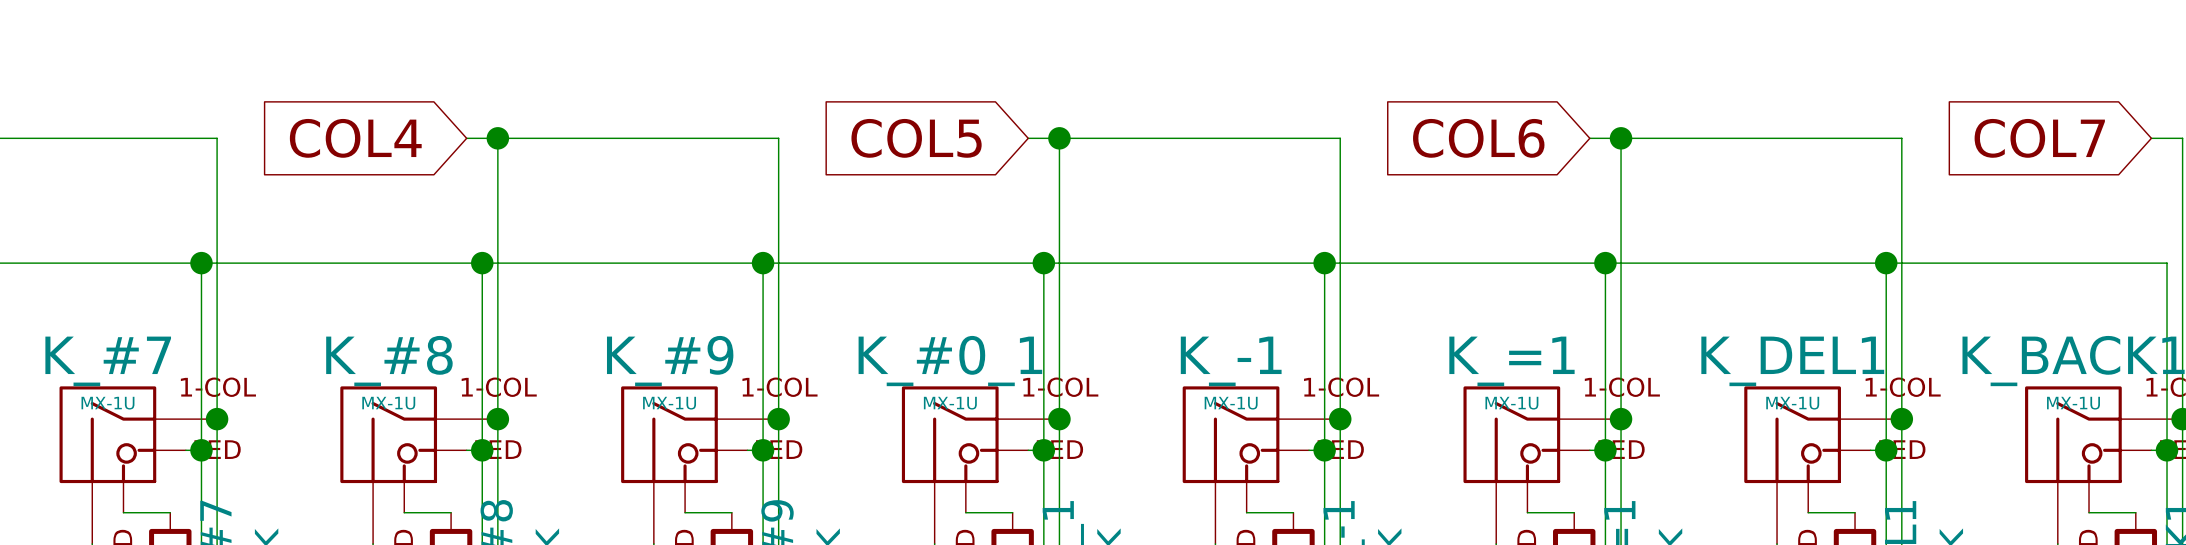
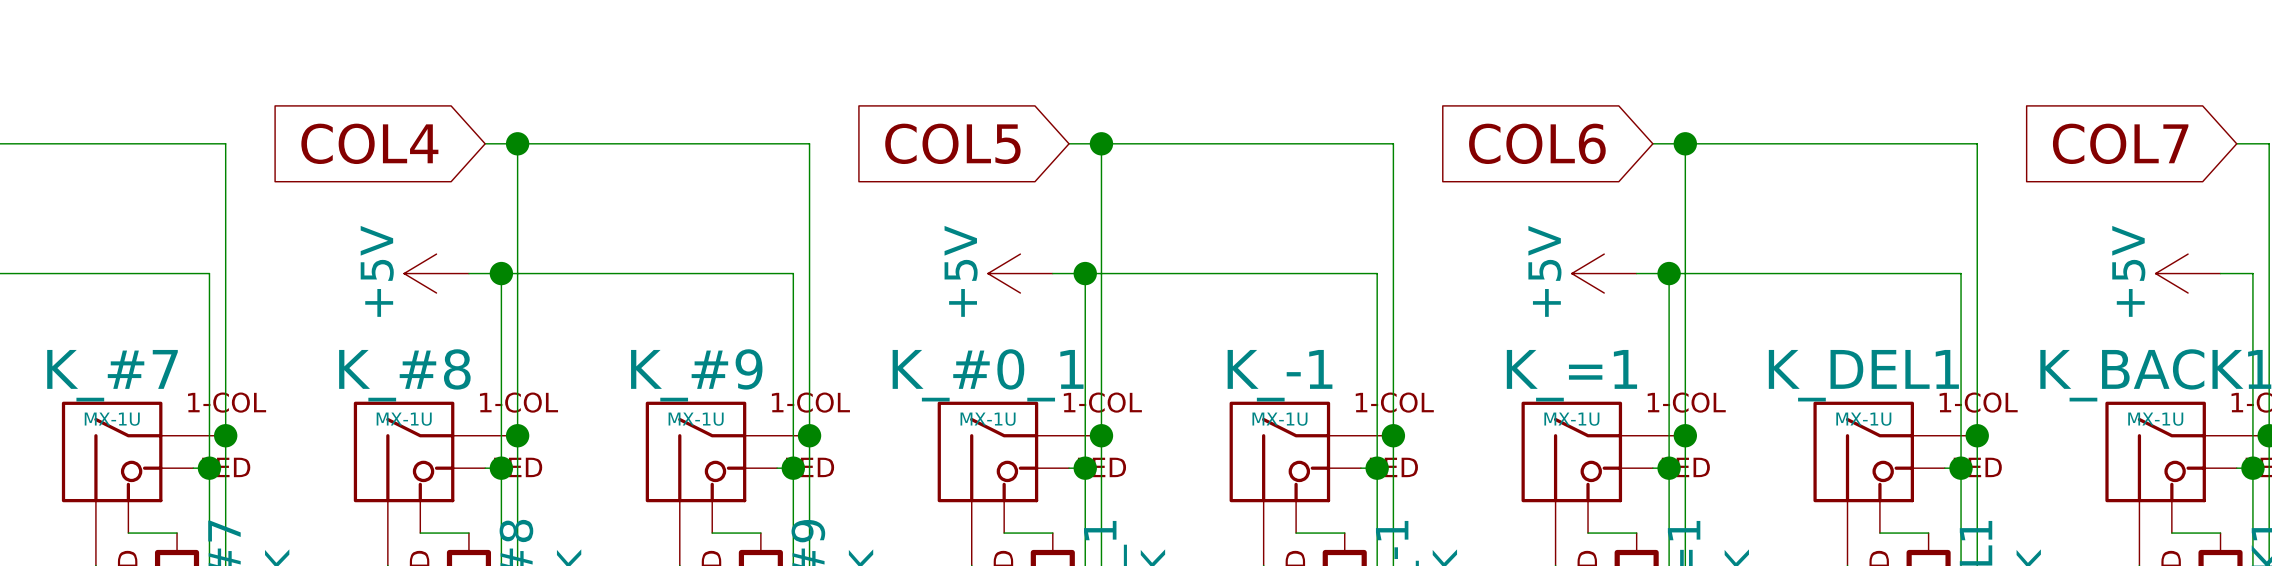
wire: (201, 263) (451, 263) -> none
junction: (201, 263) -> none
power symbol: none -> +5V (436, 273)
wire: (763, 263) (1012, 263) -> none
junction: (763, 263) -> none
power symbol: none -> +5V (1020, 273)
wire: (1324, 263) (1574, 263) -> none
junction: (1324, 263) -> none
power symbol: none -> +5V (1604, 273)
wire: (1886, 263) (2135, 263) -> none
junction: (1886, 263) -> none
power symbol: none -> +5V (2188, 273)

